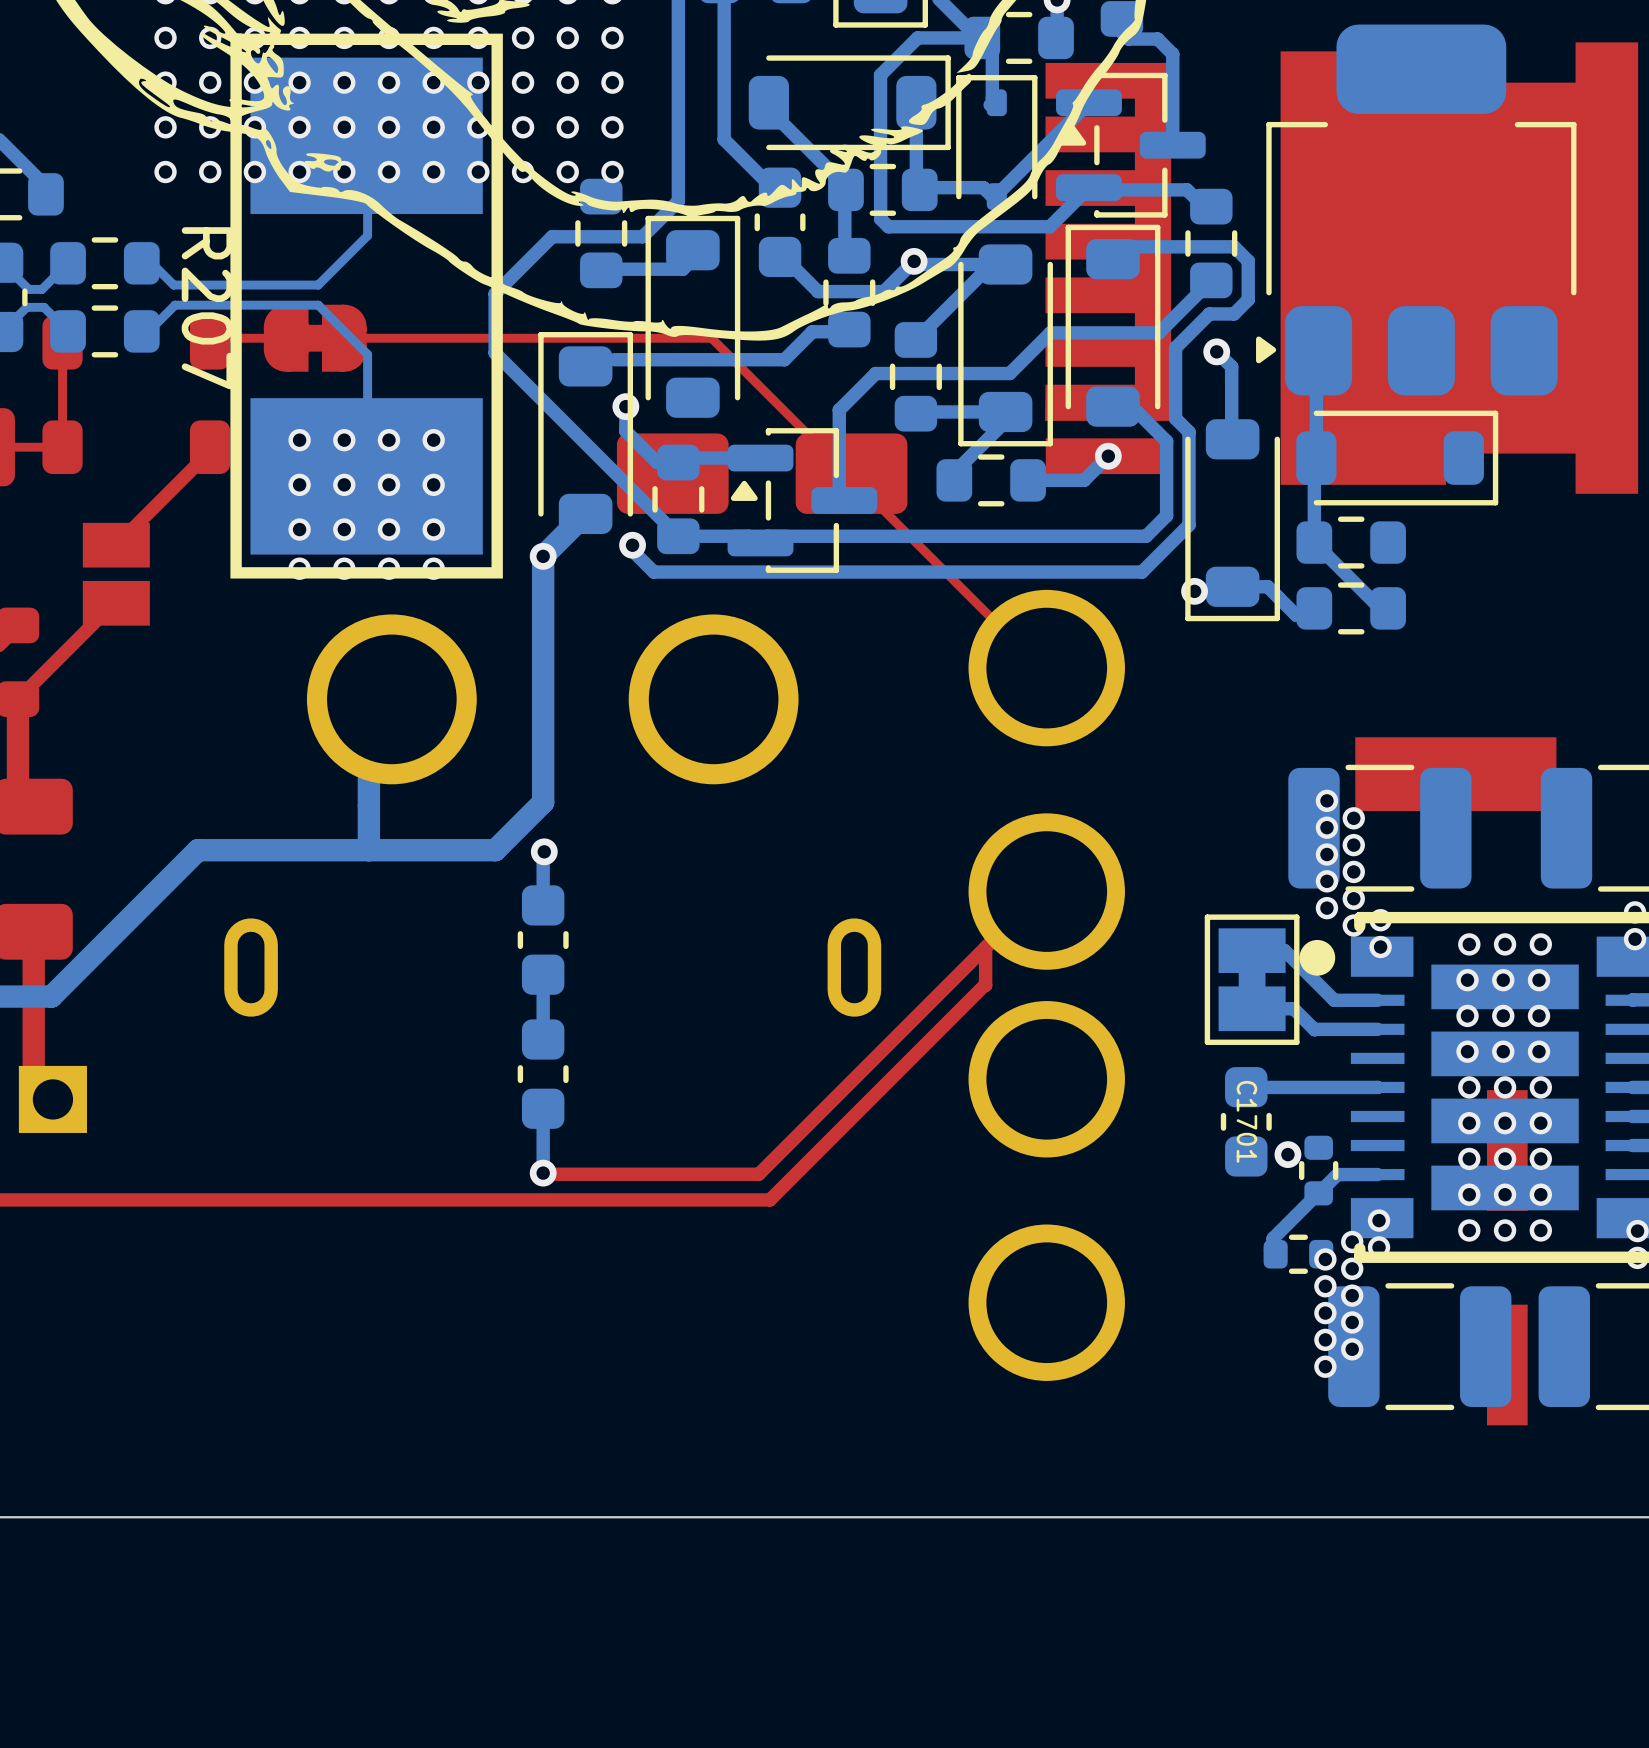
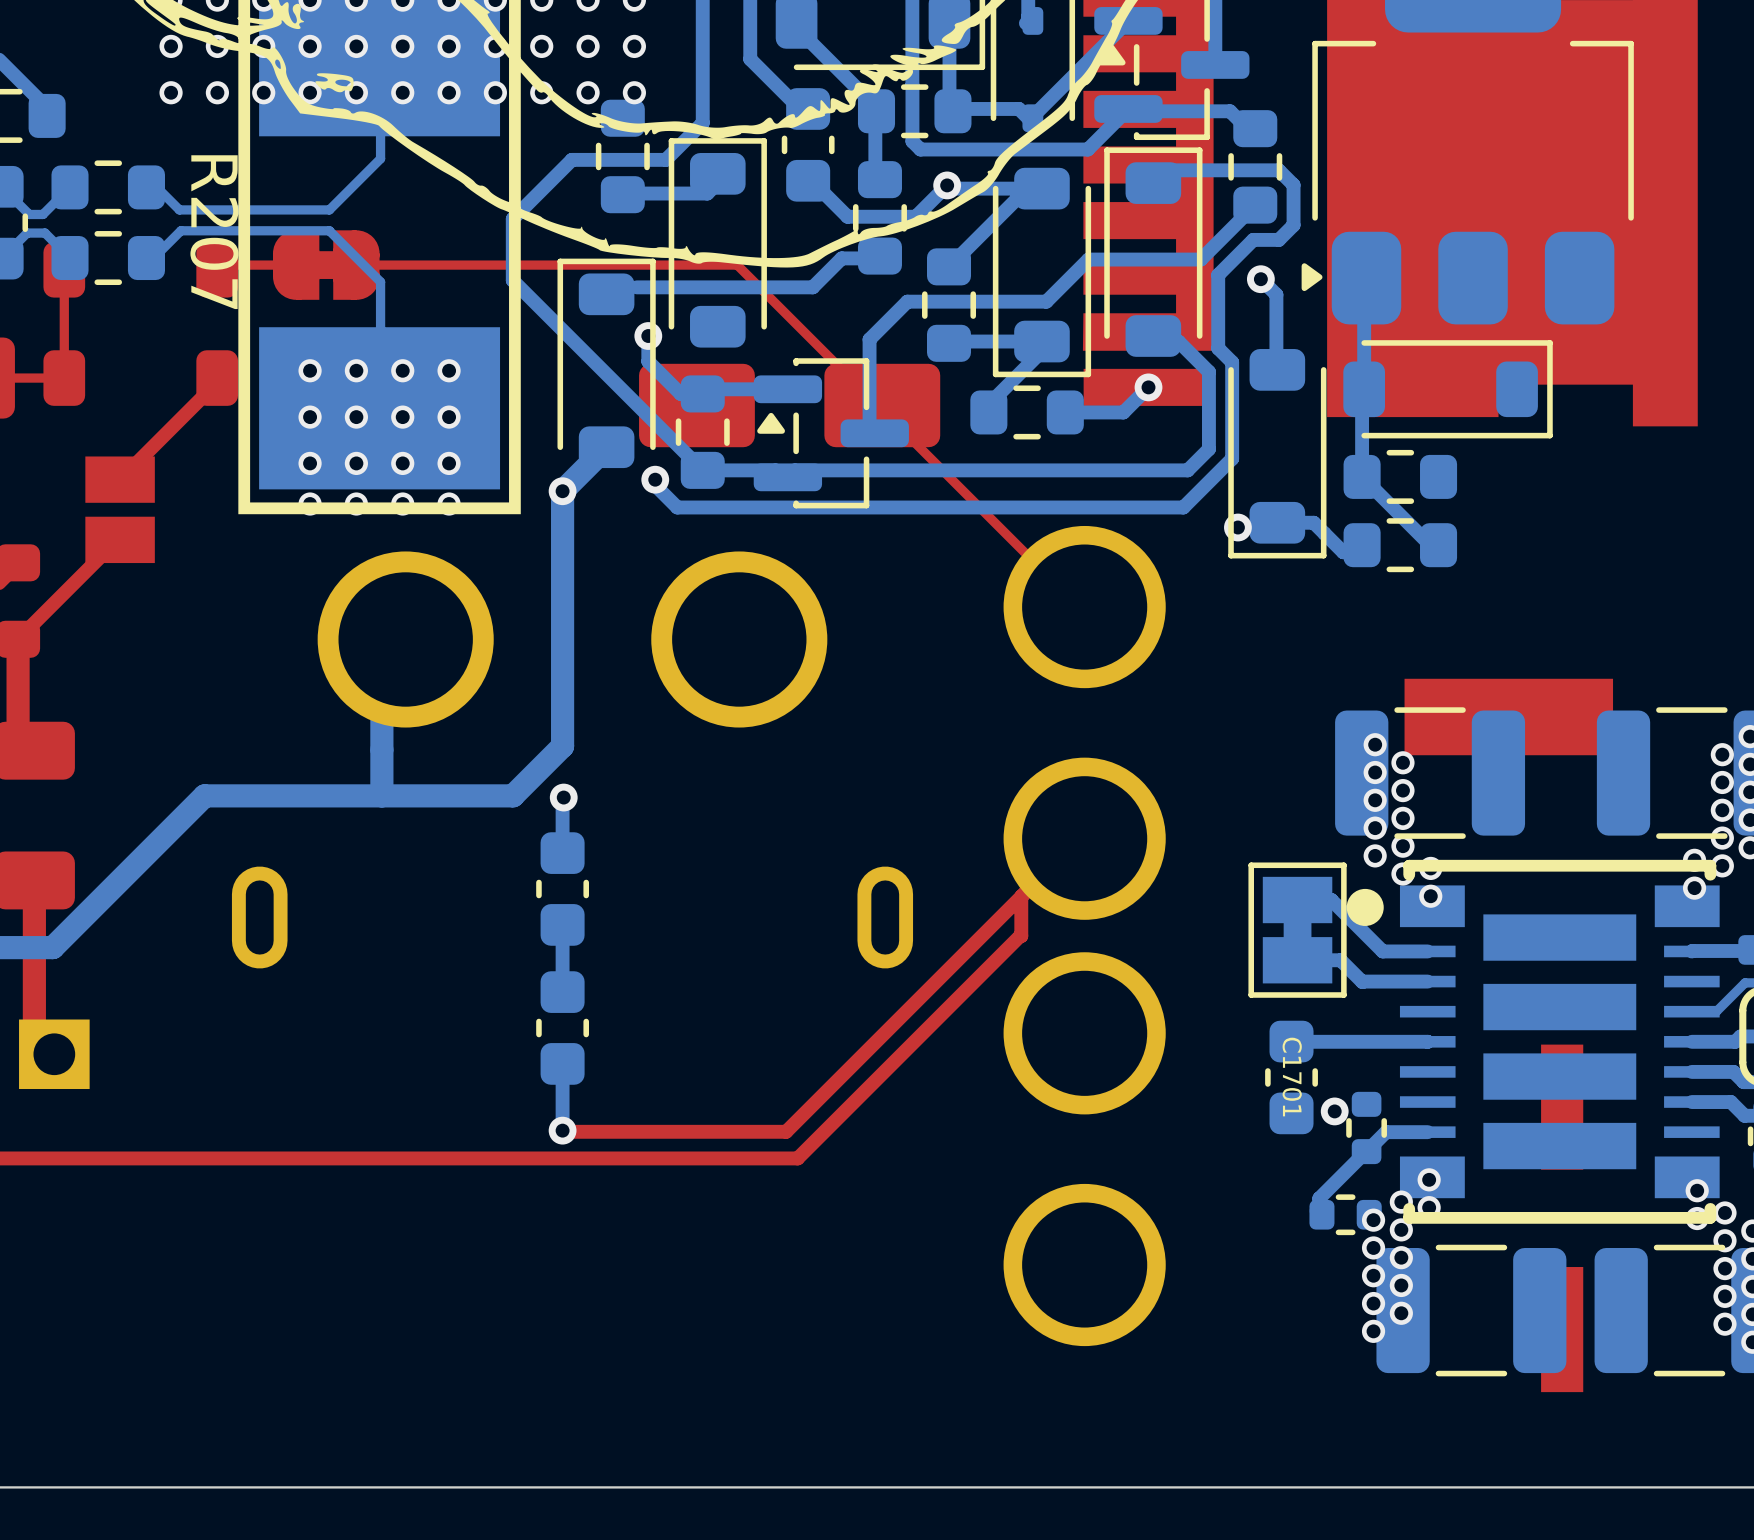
via: (1469, 944) -> none
via: (1505, 944) -> none
via: (1540, 944) -> none
via: (1467, 980) -> none
via: (1503, 980) -> none
via: (1539, 980) -> none
via: (1467, 1015) -> none
via: (1503, 1015) -> none
via: (1539, 1015) -> none
via: (1467, 1051) -> none
via: (1503, 1051) -> none
via: (1539, 1051) -> none
via: (1469, 1087) -> none
via: (1505, 1087) -> none
via: (1540, 1087) -> none
via: (1469, 1123) -> none
via: (1505, 1123) -> none
via: (1540, 1123) -> none
via: (1469, 1158) -> none
via: (1505, 1158) -> none
via: (1540, 1158) -> none
via: (1469, 1194) -> none
via: (1505, 1194) -> none
via: (1540, 1194) -> none
via: (1469, 1230) -> none
via: (1505, 1230) -> none
via: (1540, 1230) -> none

